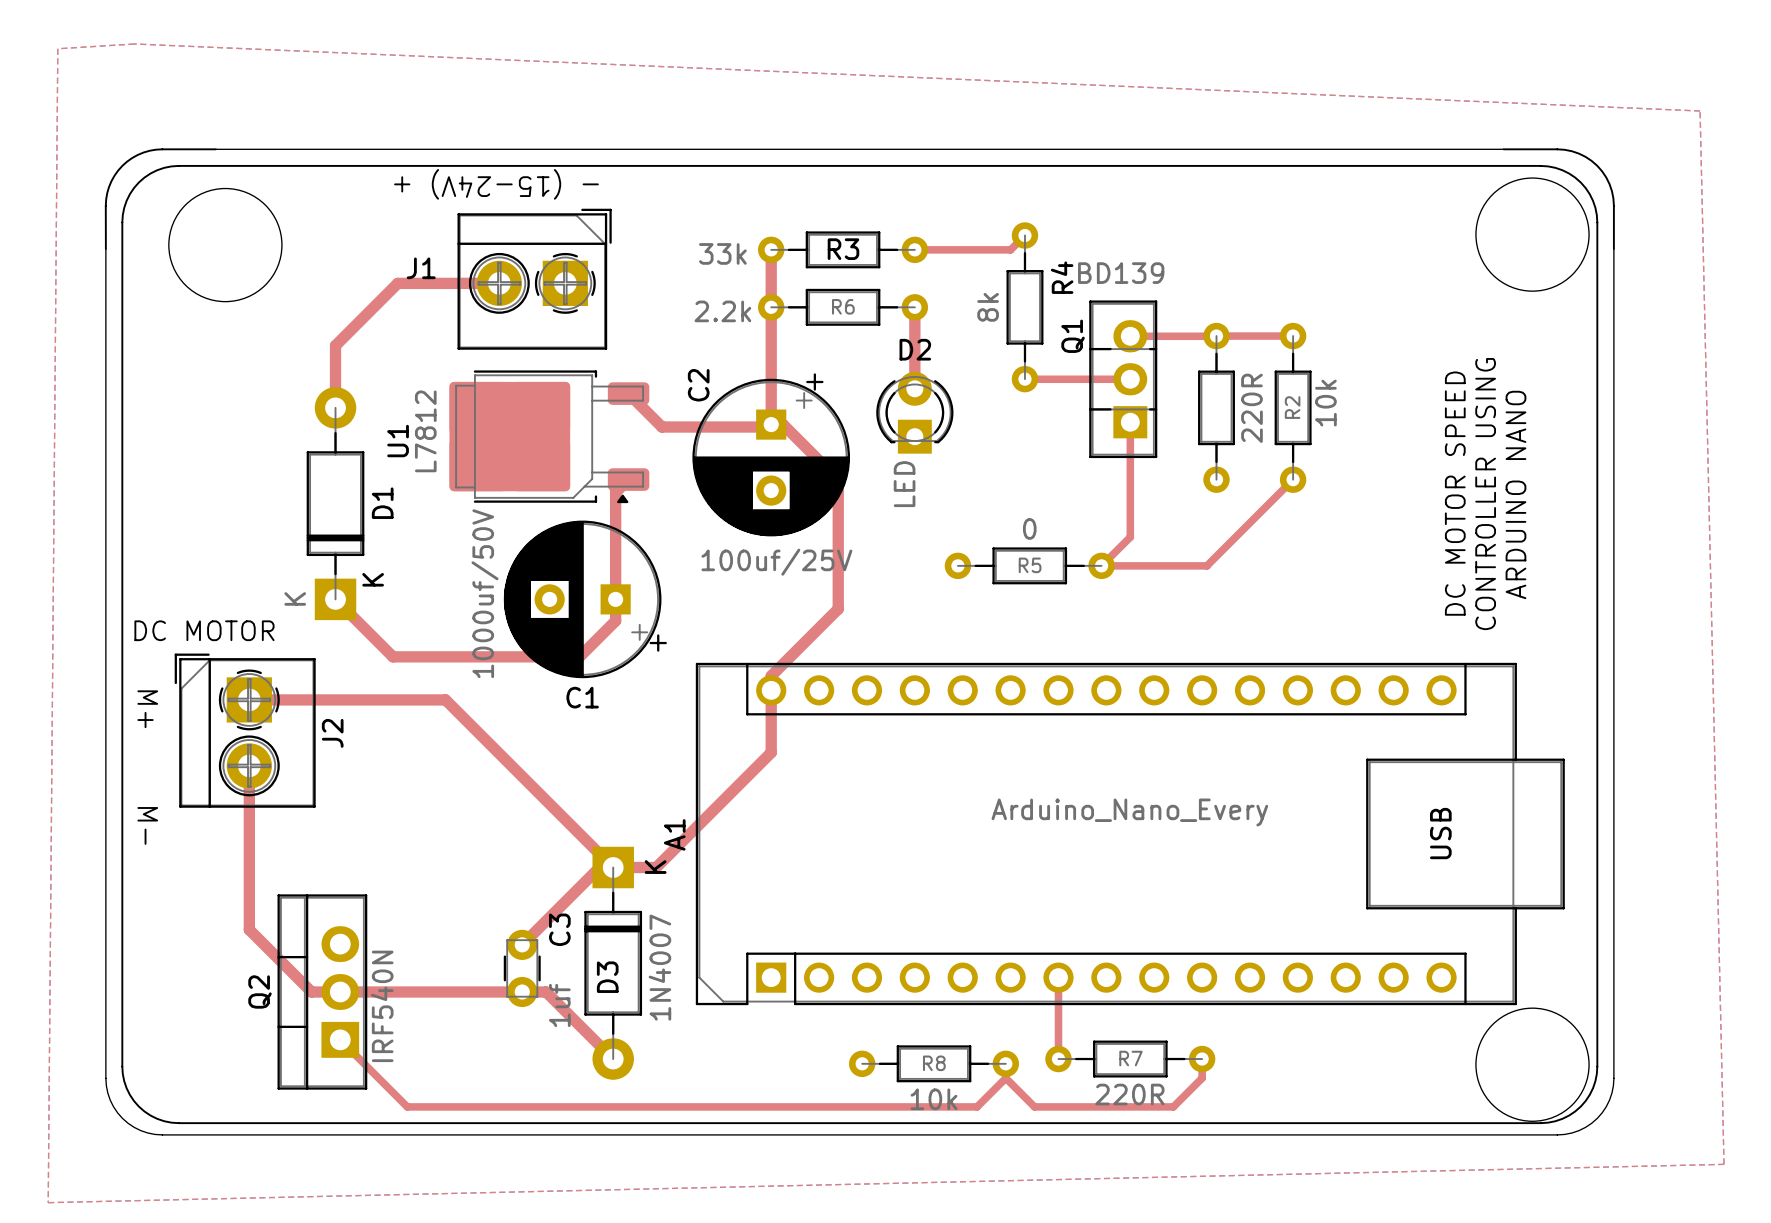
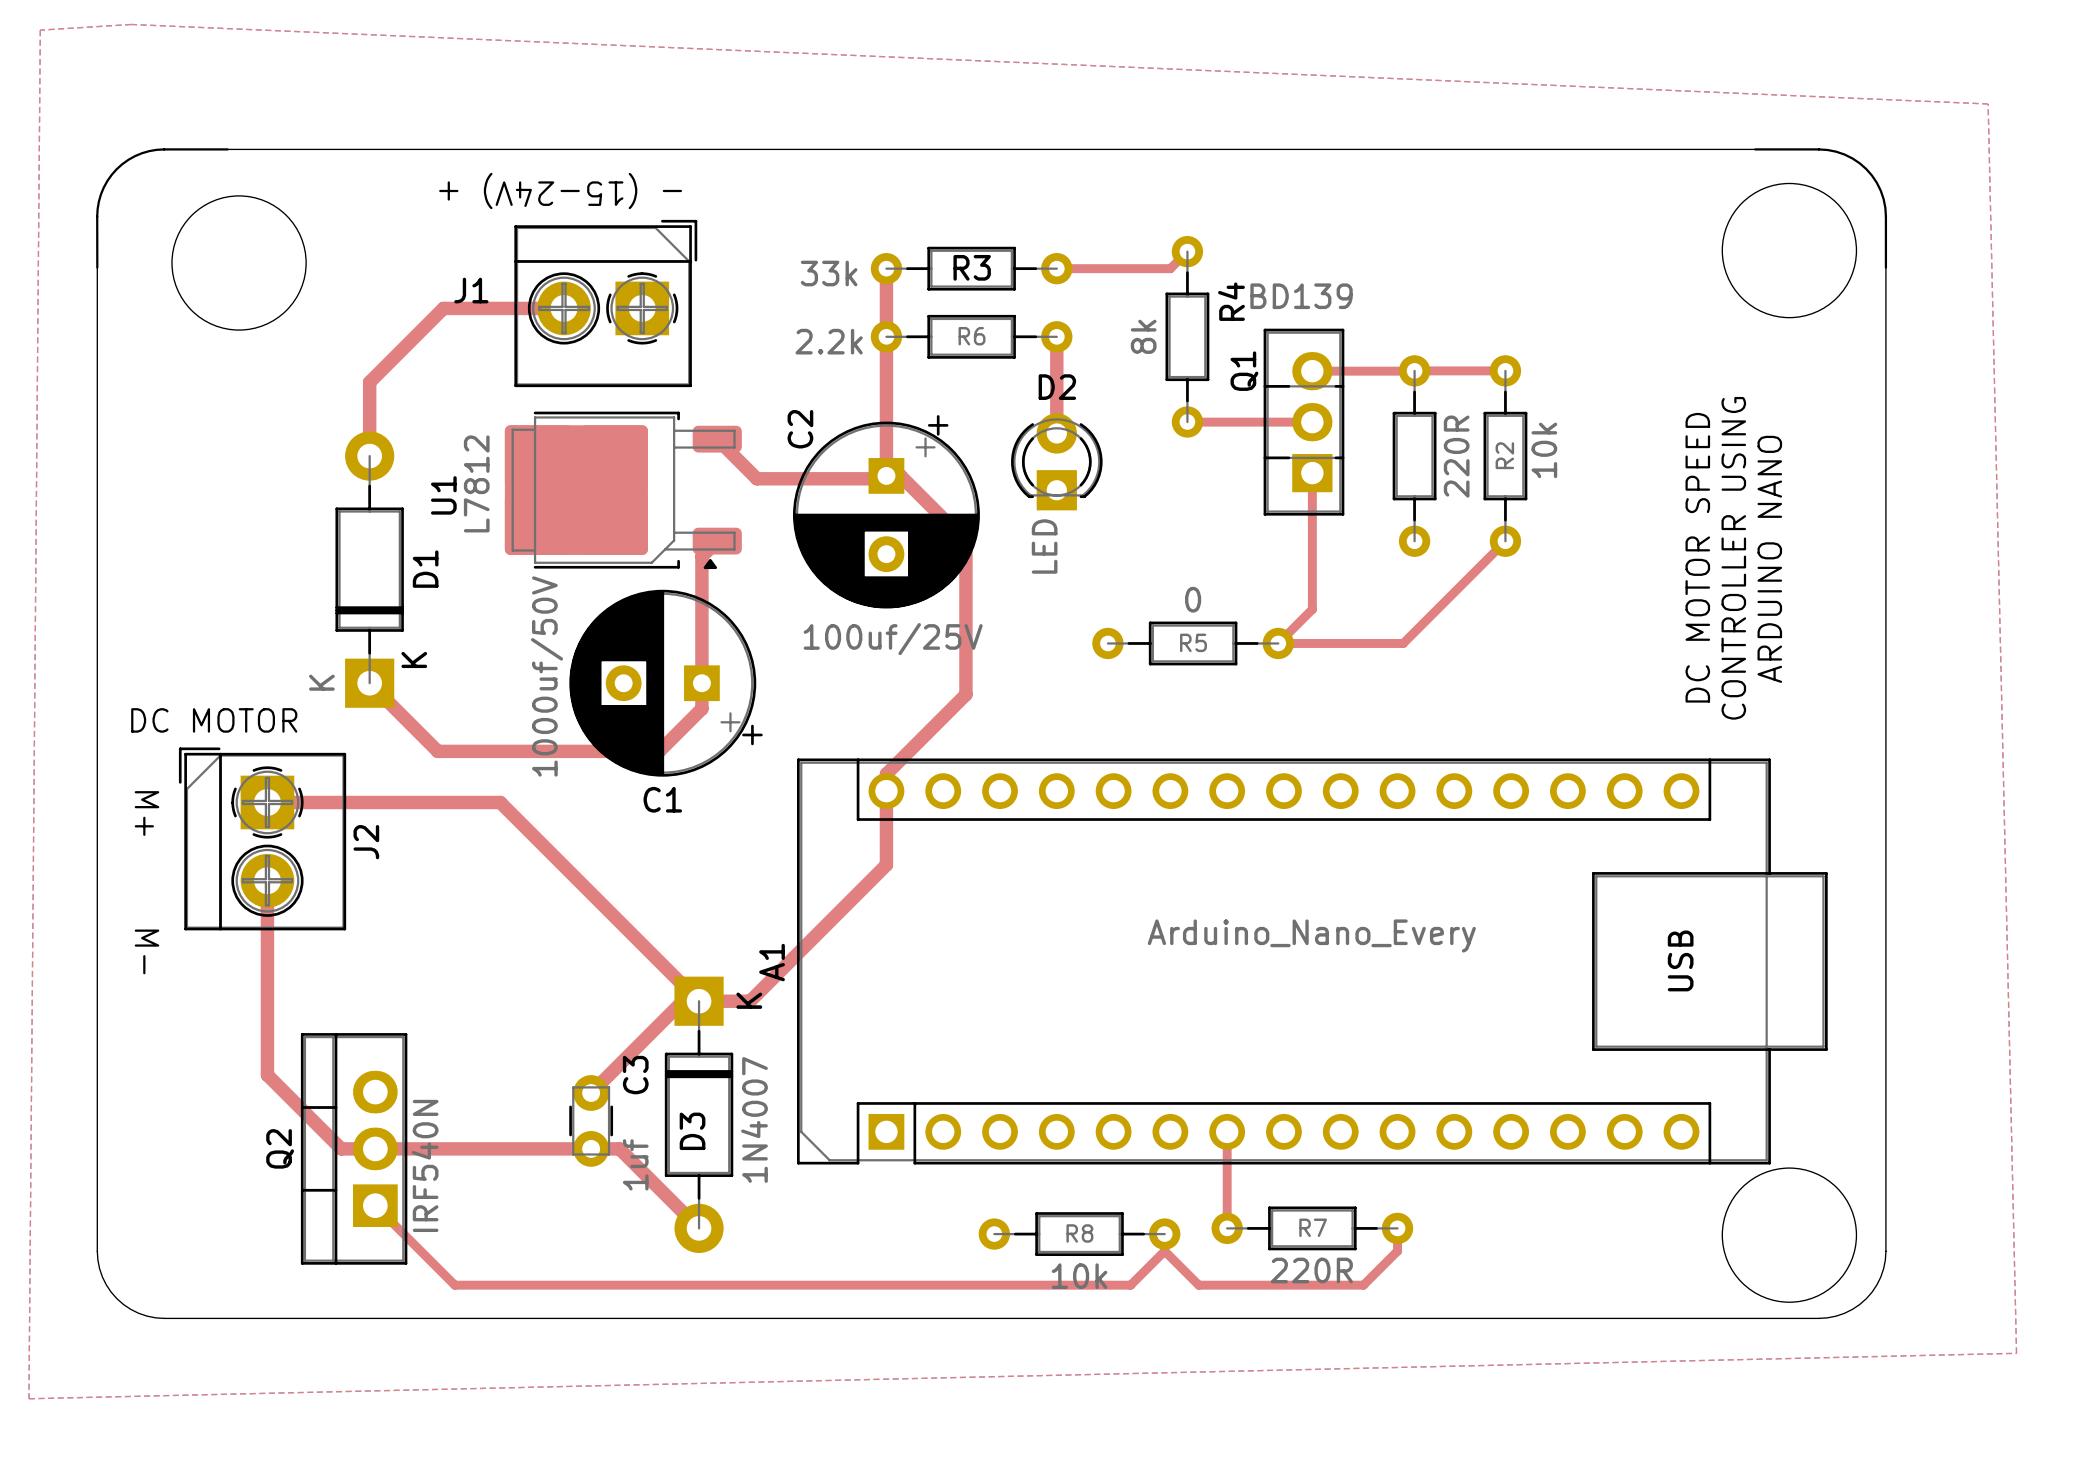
line: (178, 165) (1540, 165) (1555, 167) (1569, 173) (1580, 182) (1589, 194) (1595, 207) (1597, 222) (1597, 1066) (1595, 1081) (1589, 1094) (1580, 1106) (1569, 1115) (1555, 1121) (1540, 1123) (178, 1123) (164, 1121) (150, 1115) (138, 1106) (129, 1094) (124, 1081) (122, 1066) (122, 222) (126, 200) (138, 182) (157, 170) (178, 165) -> none

